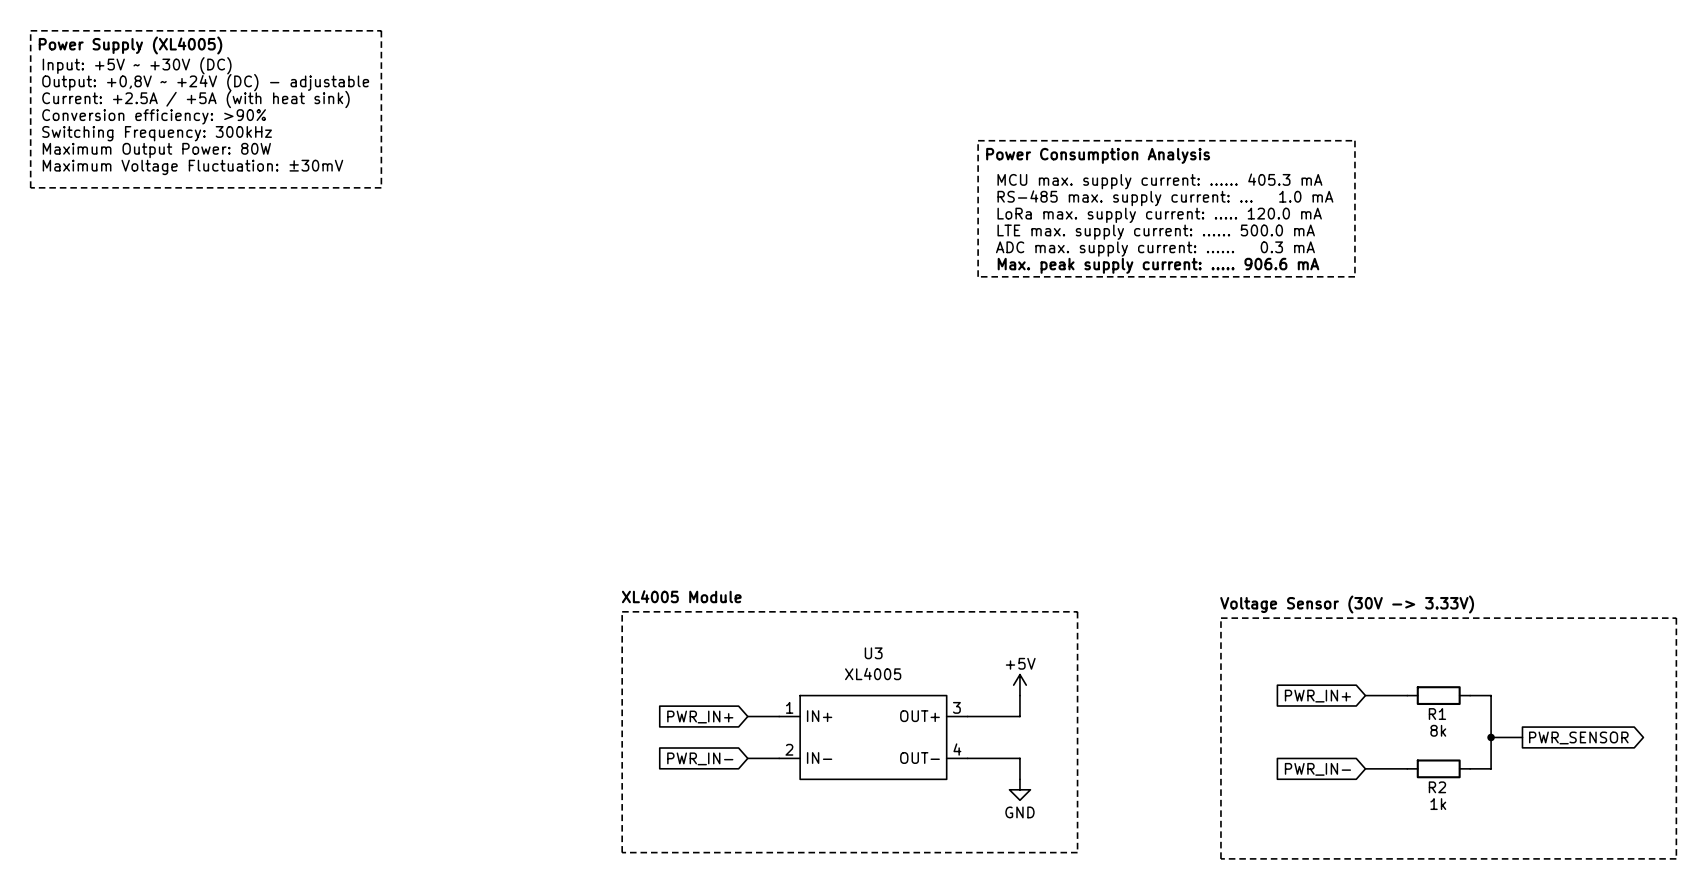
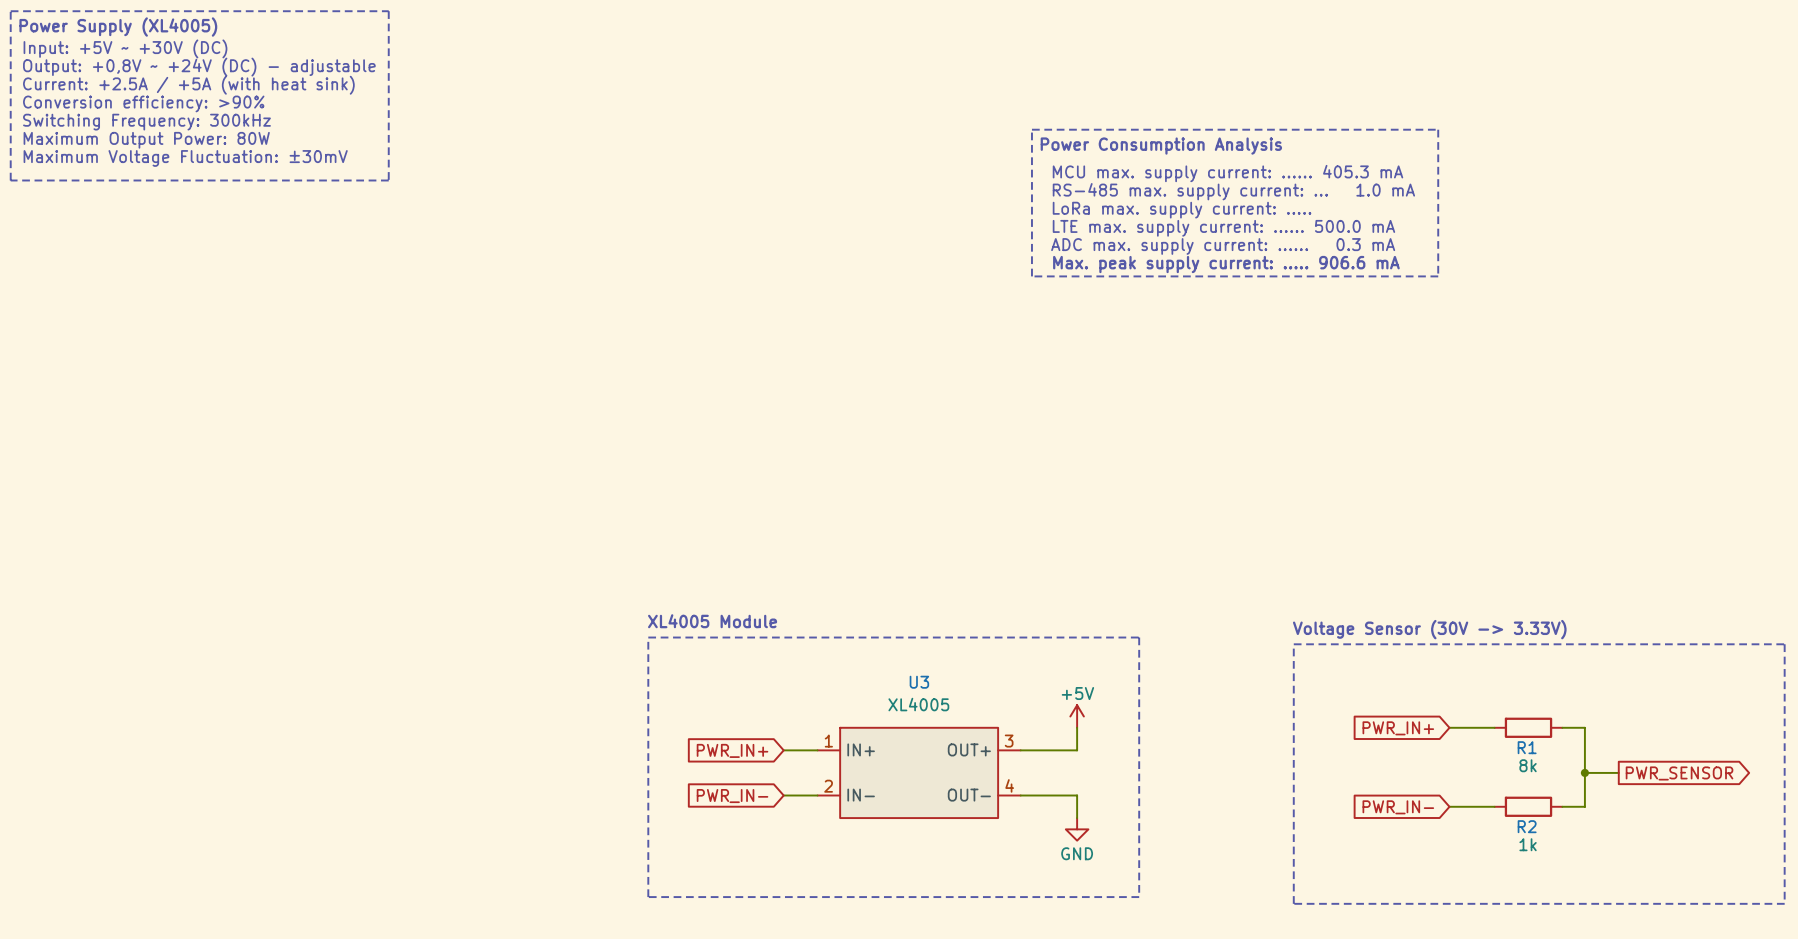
text: LoRa max. supply current: ..... 120.0 mA (1159, 215) -> LoRa max. supply current: ..... (1182, 210)

